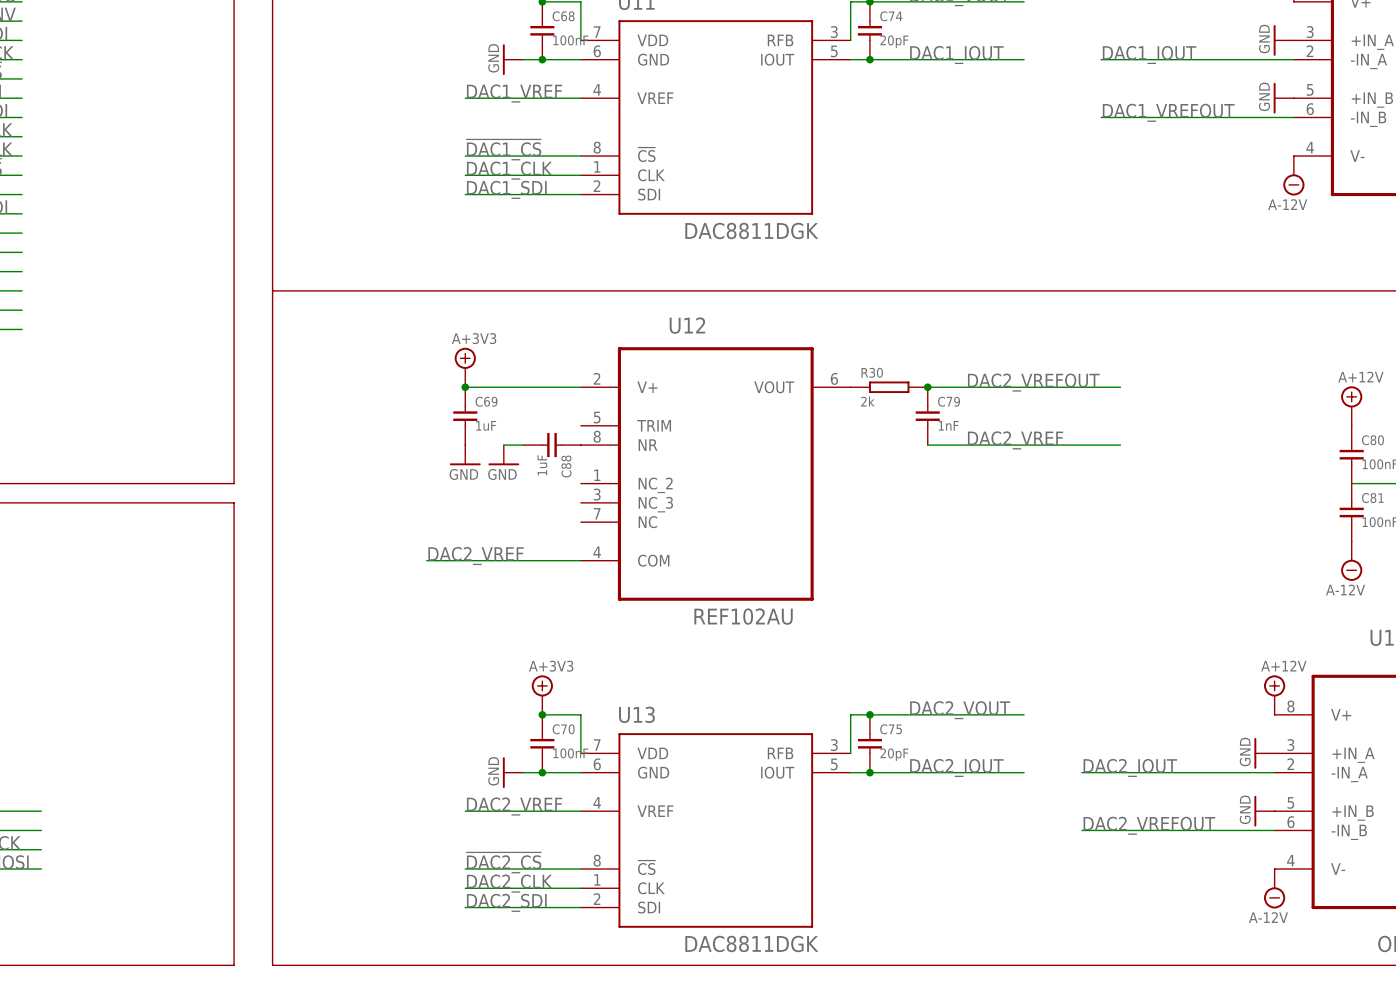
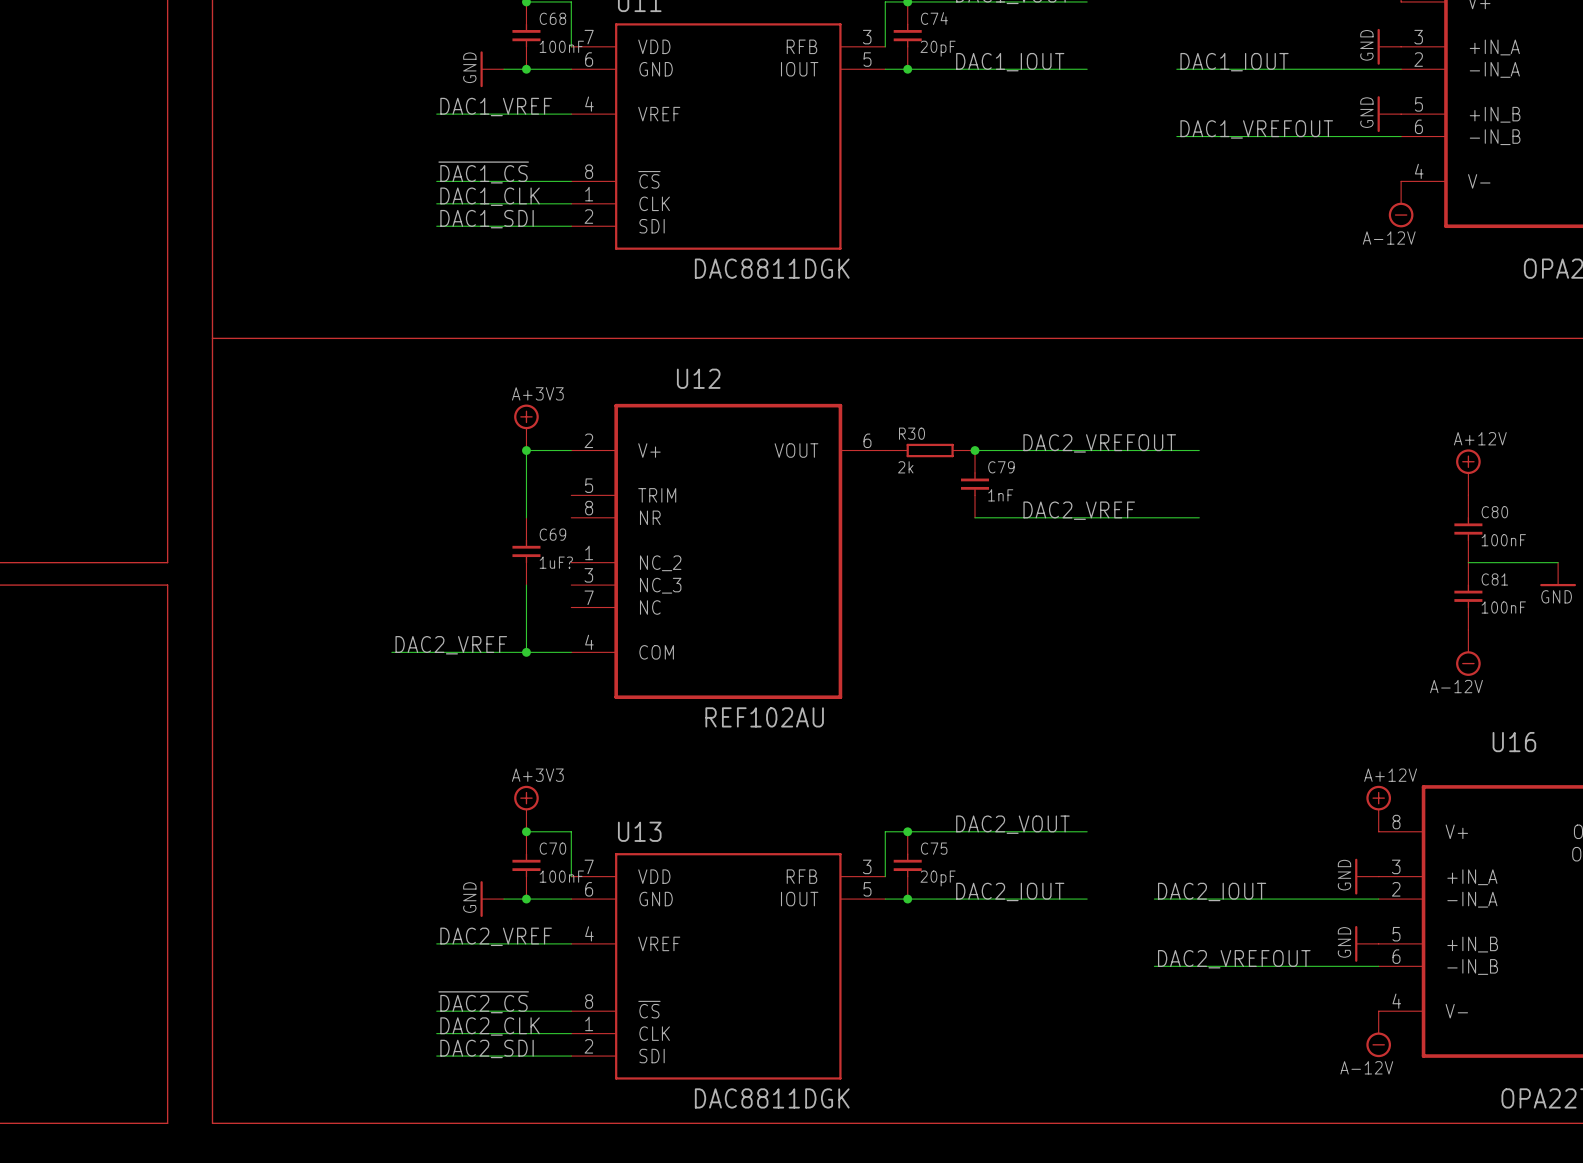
power symbol position: A+3V3 (465, 367) -> A+3V3 (526, 427)
wire: (465, 387) (542, 387) -> (526, 517) (526, 450)
junction: (465, 387) -> none
junction: none -> (526, 450)
C69 position: (465, 416) -> (526, 551)
C69 value: 1uF (486, 425) -> 1uF? (556, 562)
wire: (503, 445) (523, 445) -> none
C88: 1uF (551, 445) -> none
power symbol: GND (465, 455) -> none
power symbol: GND (503, 455) -> none
wire: none -> (526, 585) (526, 652)
junction: none -> (526, 652)

